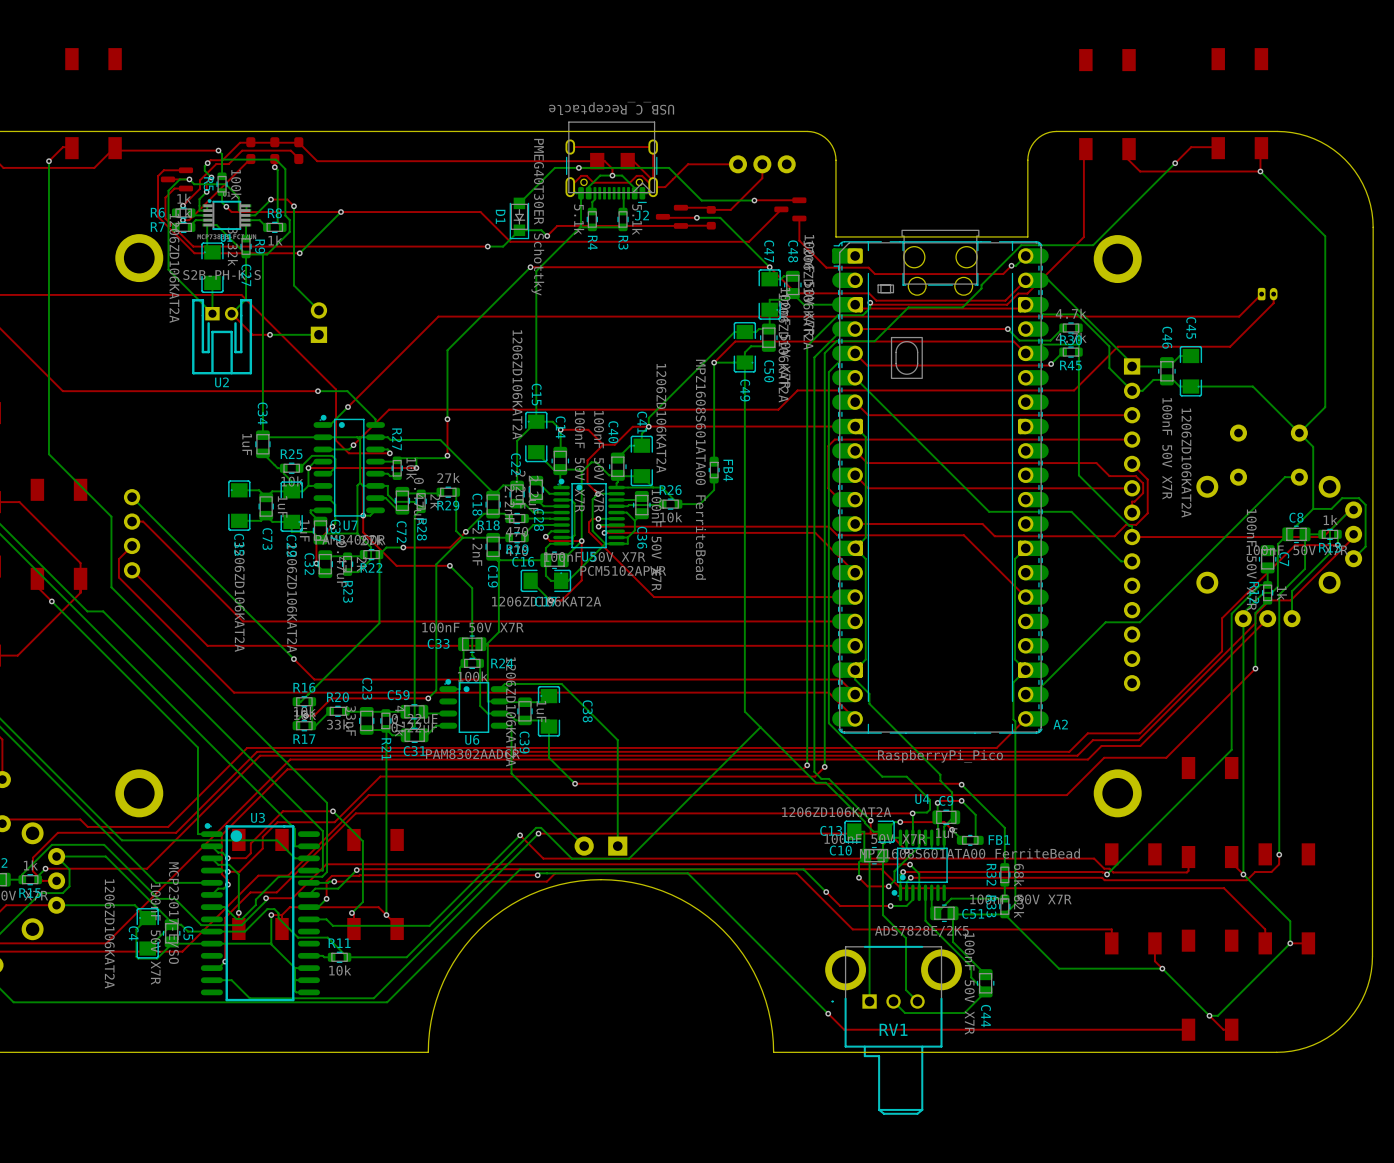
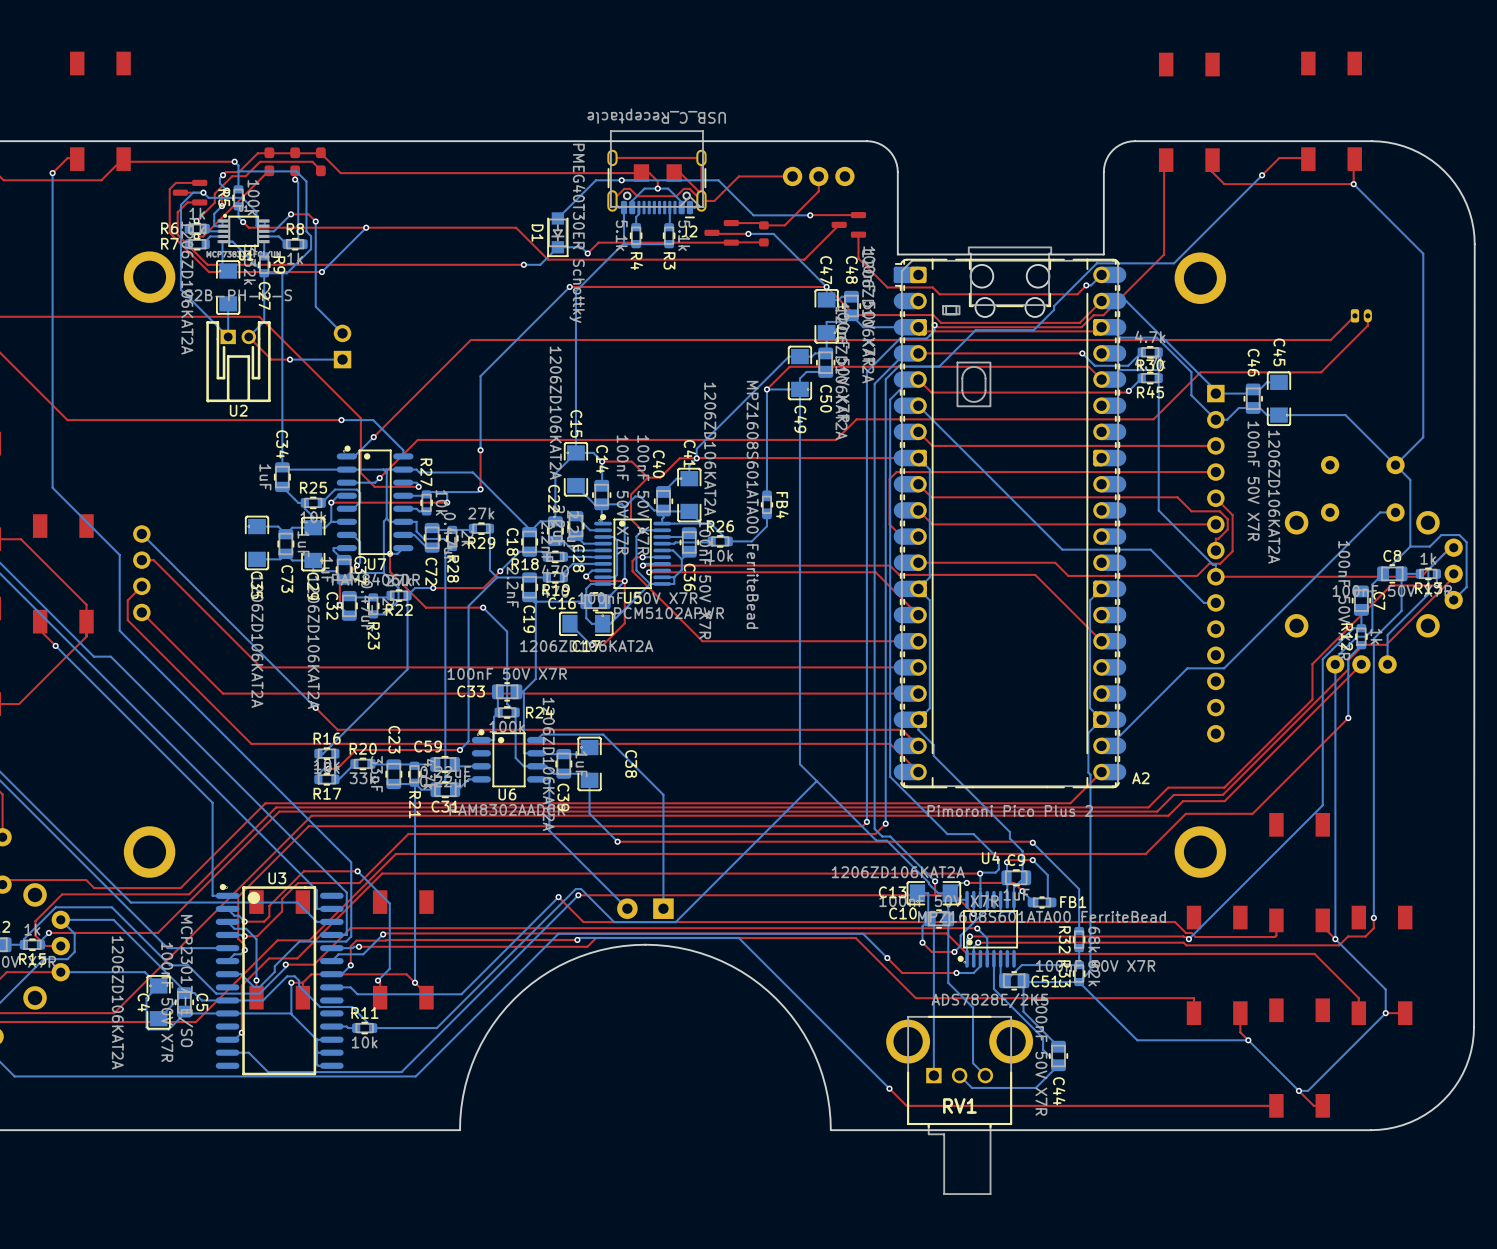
A2 value: RaspberryPi_Pico (940, 756) -> Pimoroni Pico Plus 2 (1010, 810)
RV1 footprint: [825, 945, 962, 1115] -> [886, 1015, 1034, 1195]

